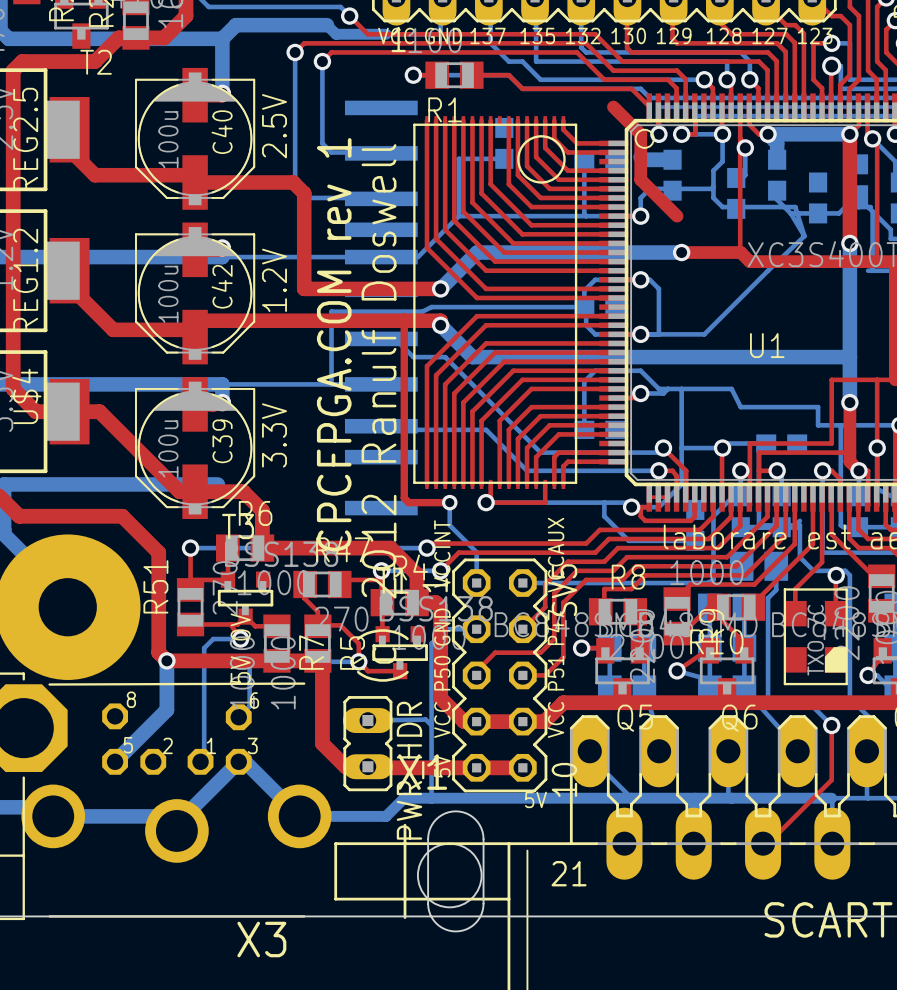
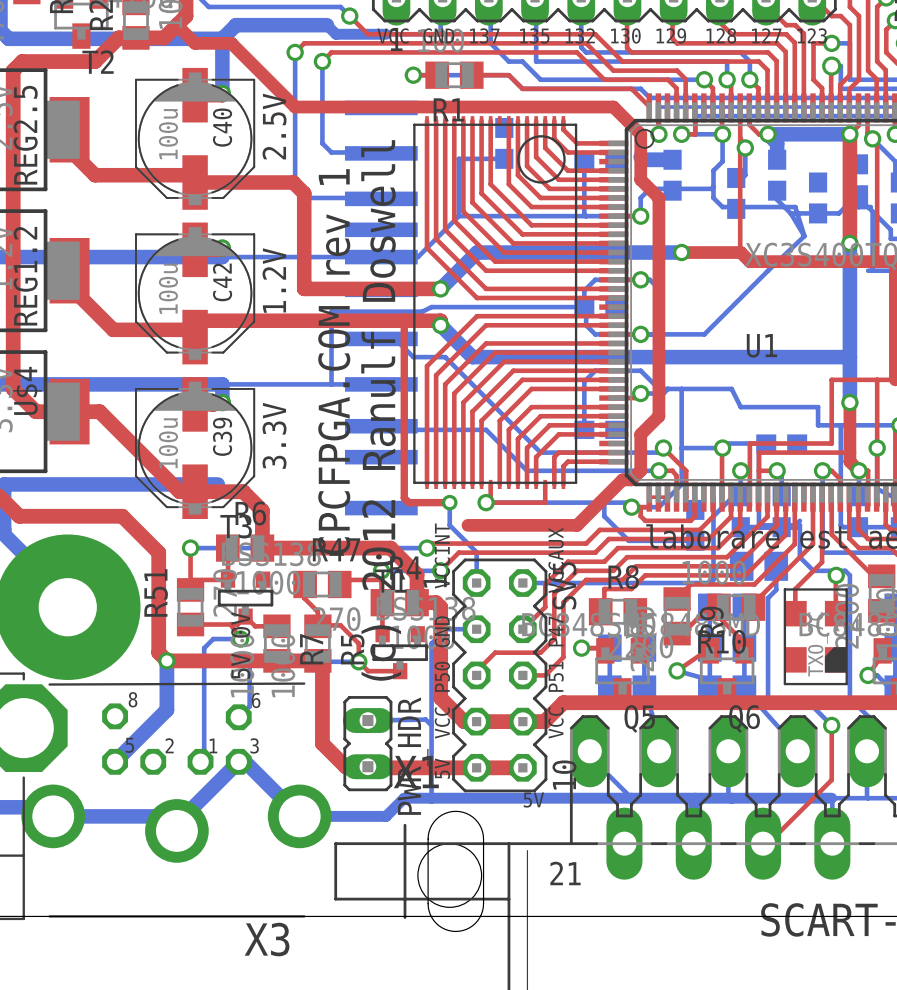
top track: none -> (176, 25) (195, 43) (231, 43) (295, 107) (613, 107)
top track: (658, 197) (677, 216) -> (658, 197) (658, 416) (640, 434) (640, 470) (631, 479) (622, 479) (577, 525) (467, 525)

